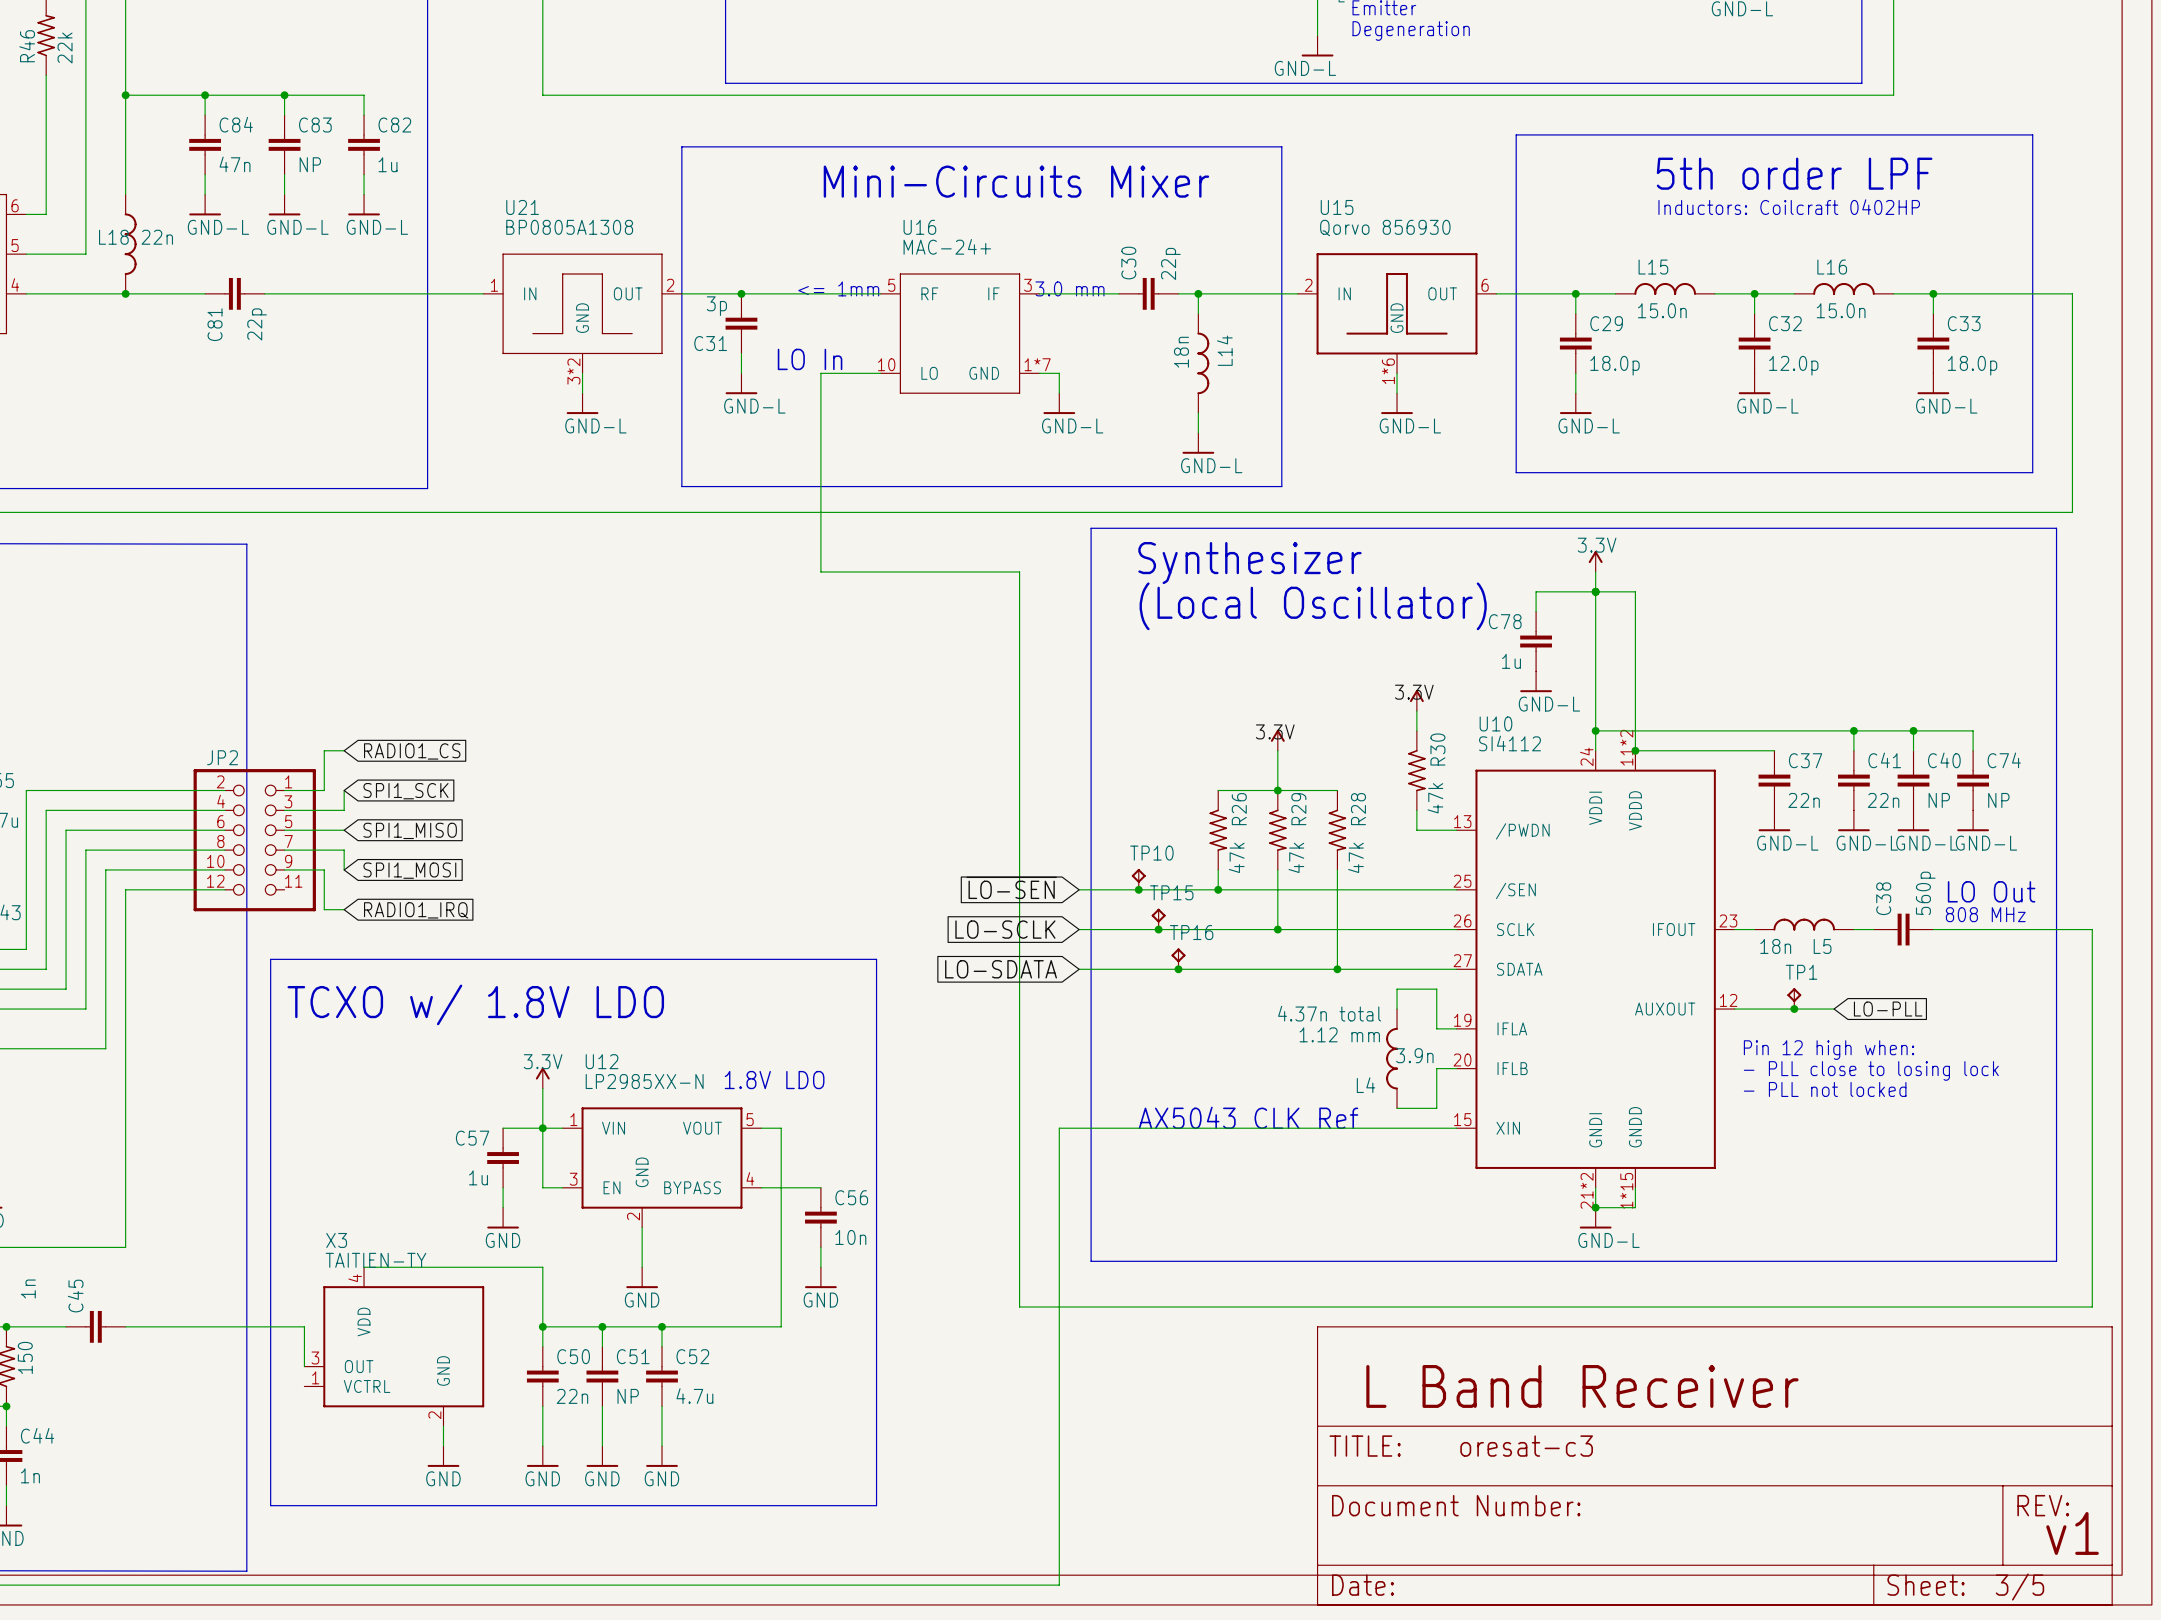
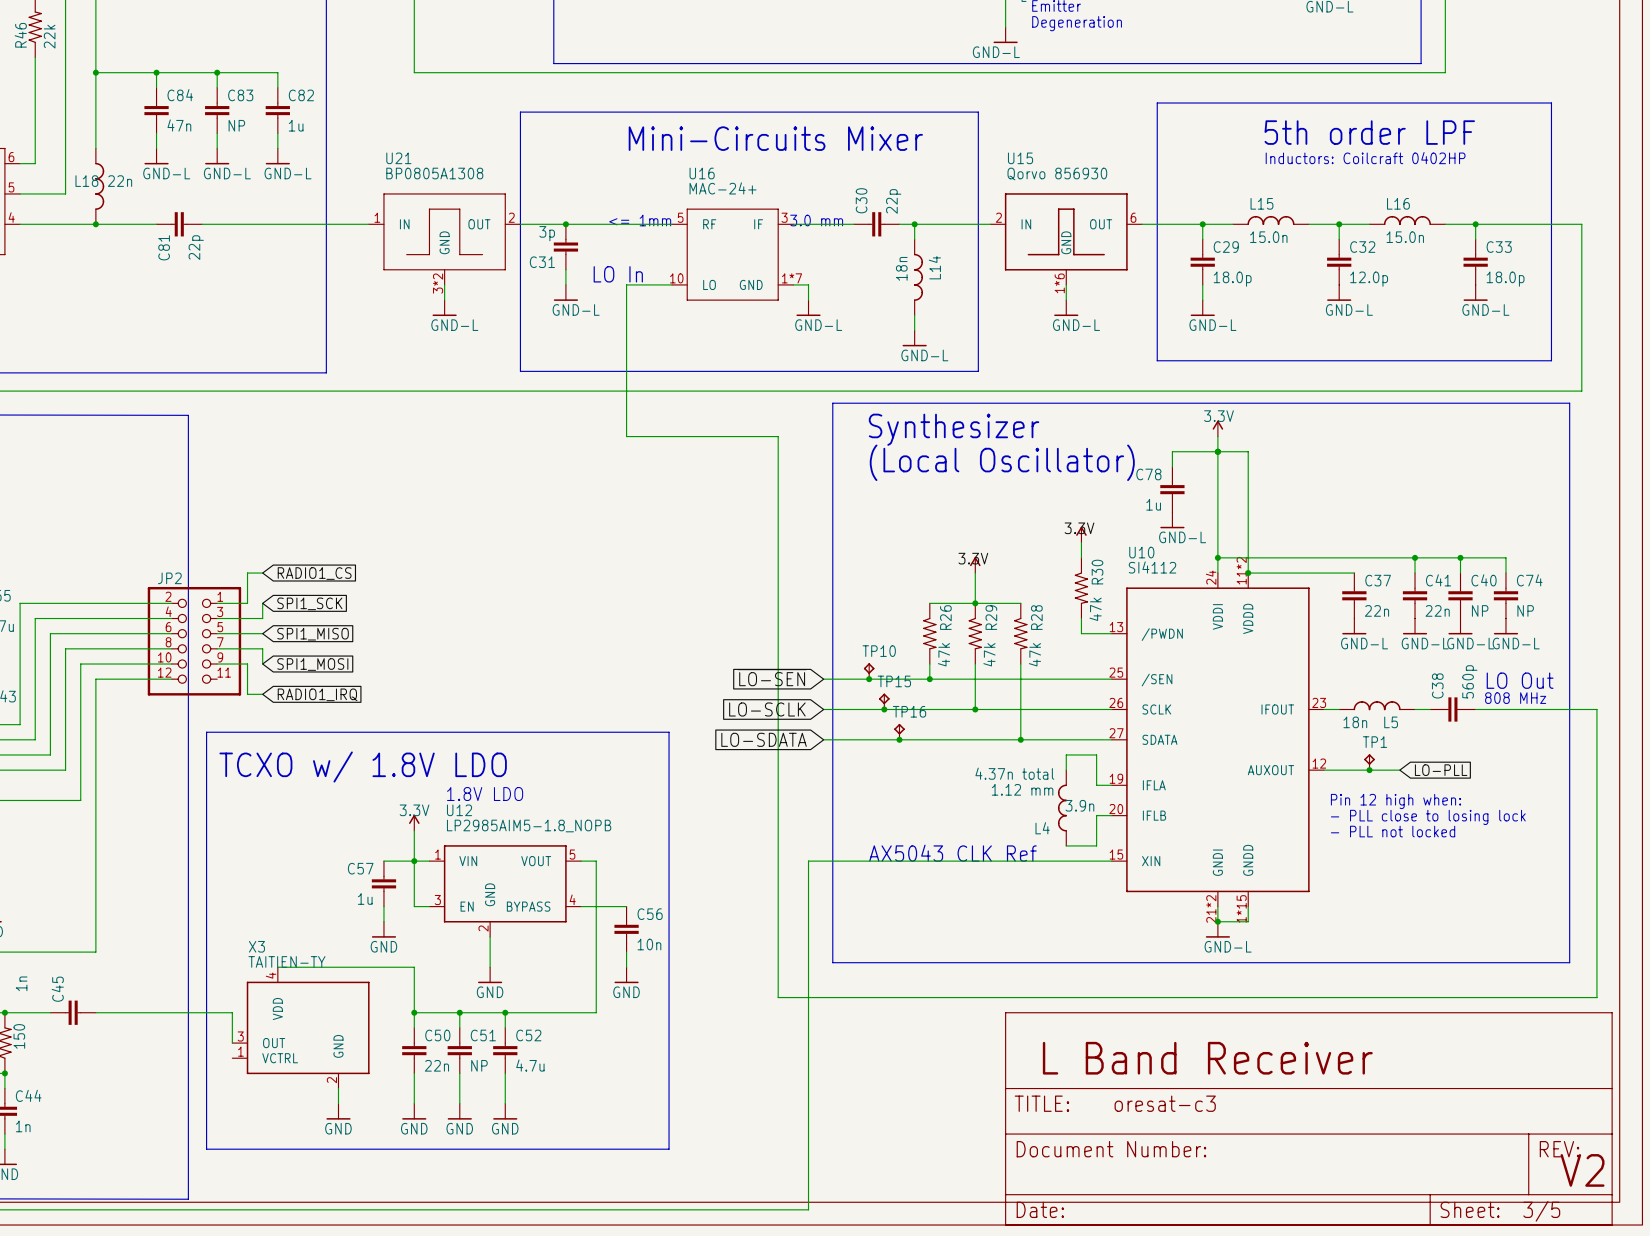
text position: 1.8V LDO (774, 1080) -> 1.8V LDO (485, 794)
U12 value: LP2985XX-N (644, 1081) -> LP2985AIM5-1.8_NOPB (529, 825)
text: v1 (2072, 1533) -> V2 (1582, 1170)

